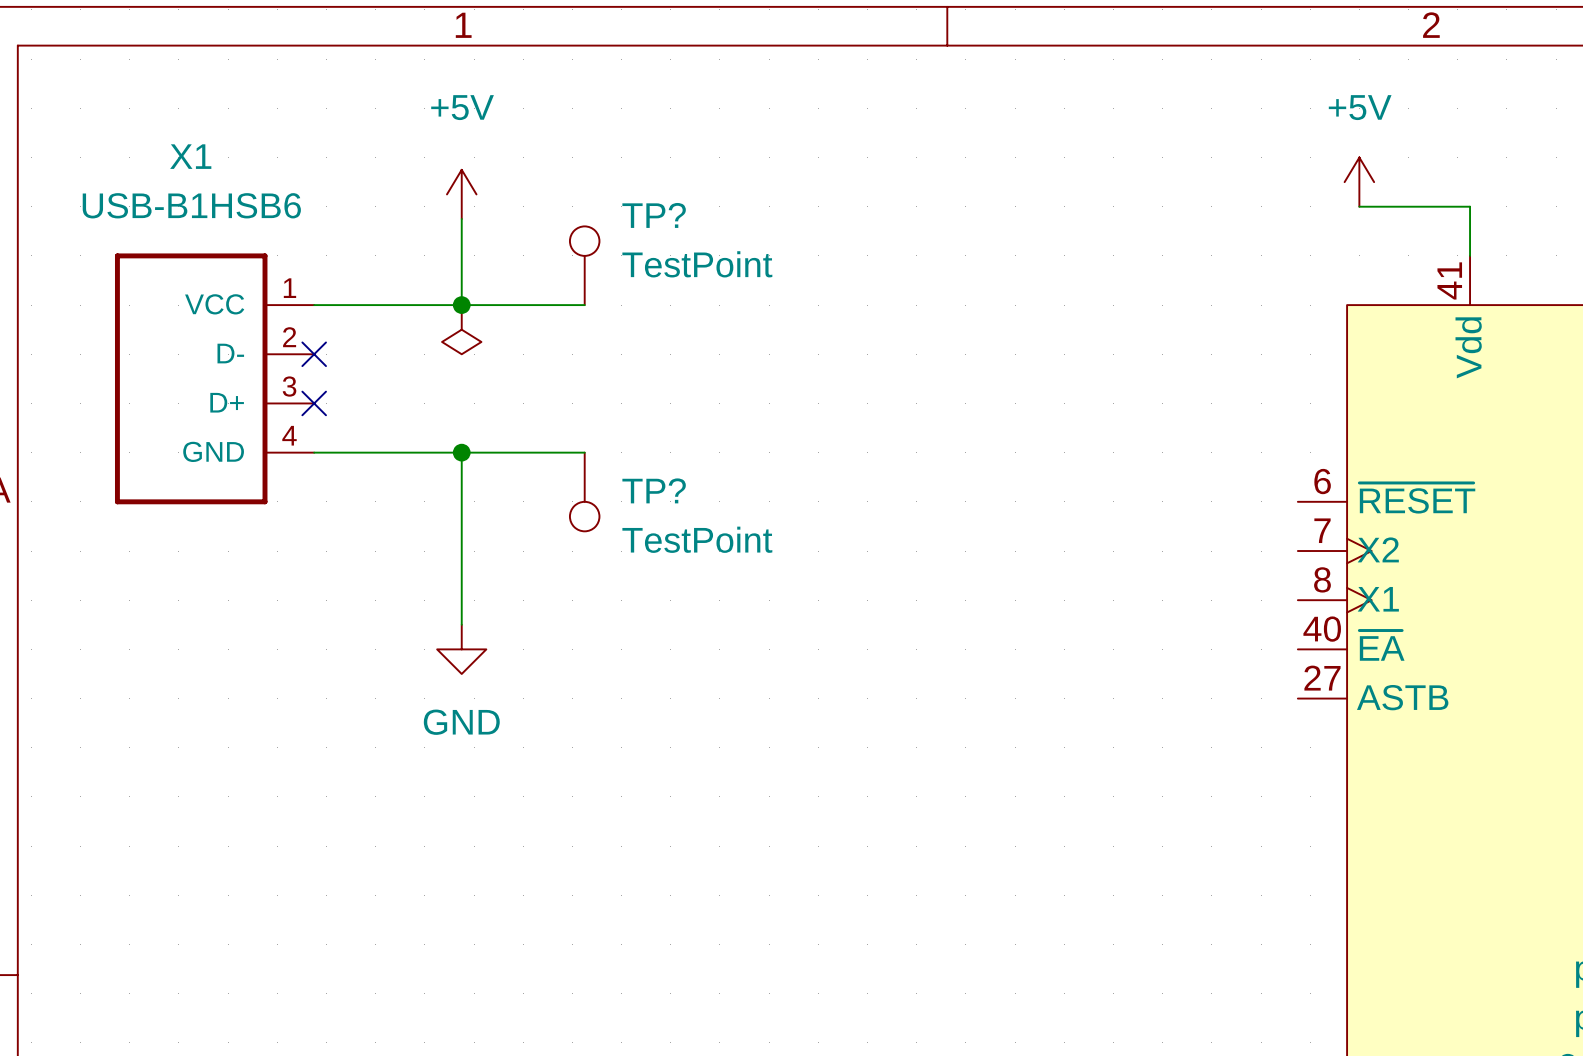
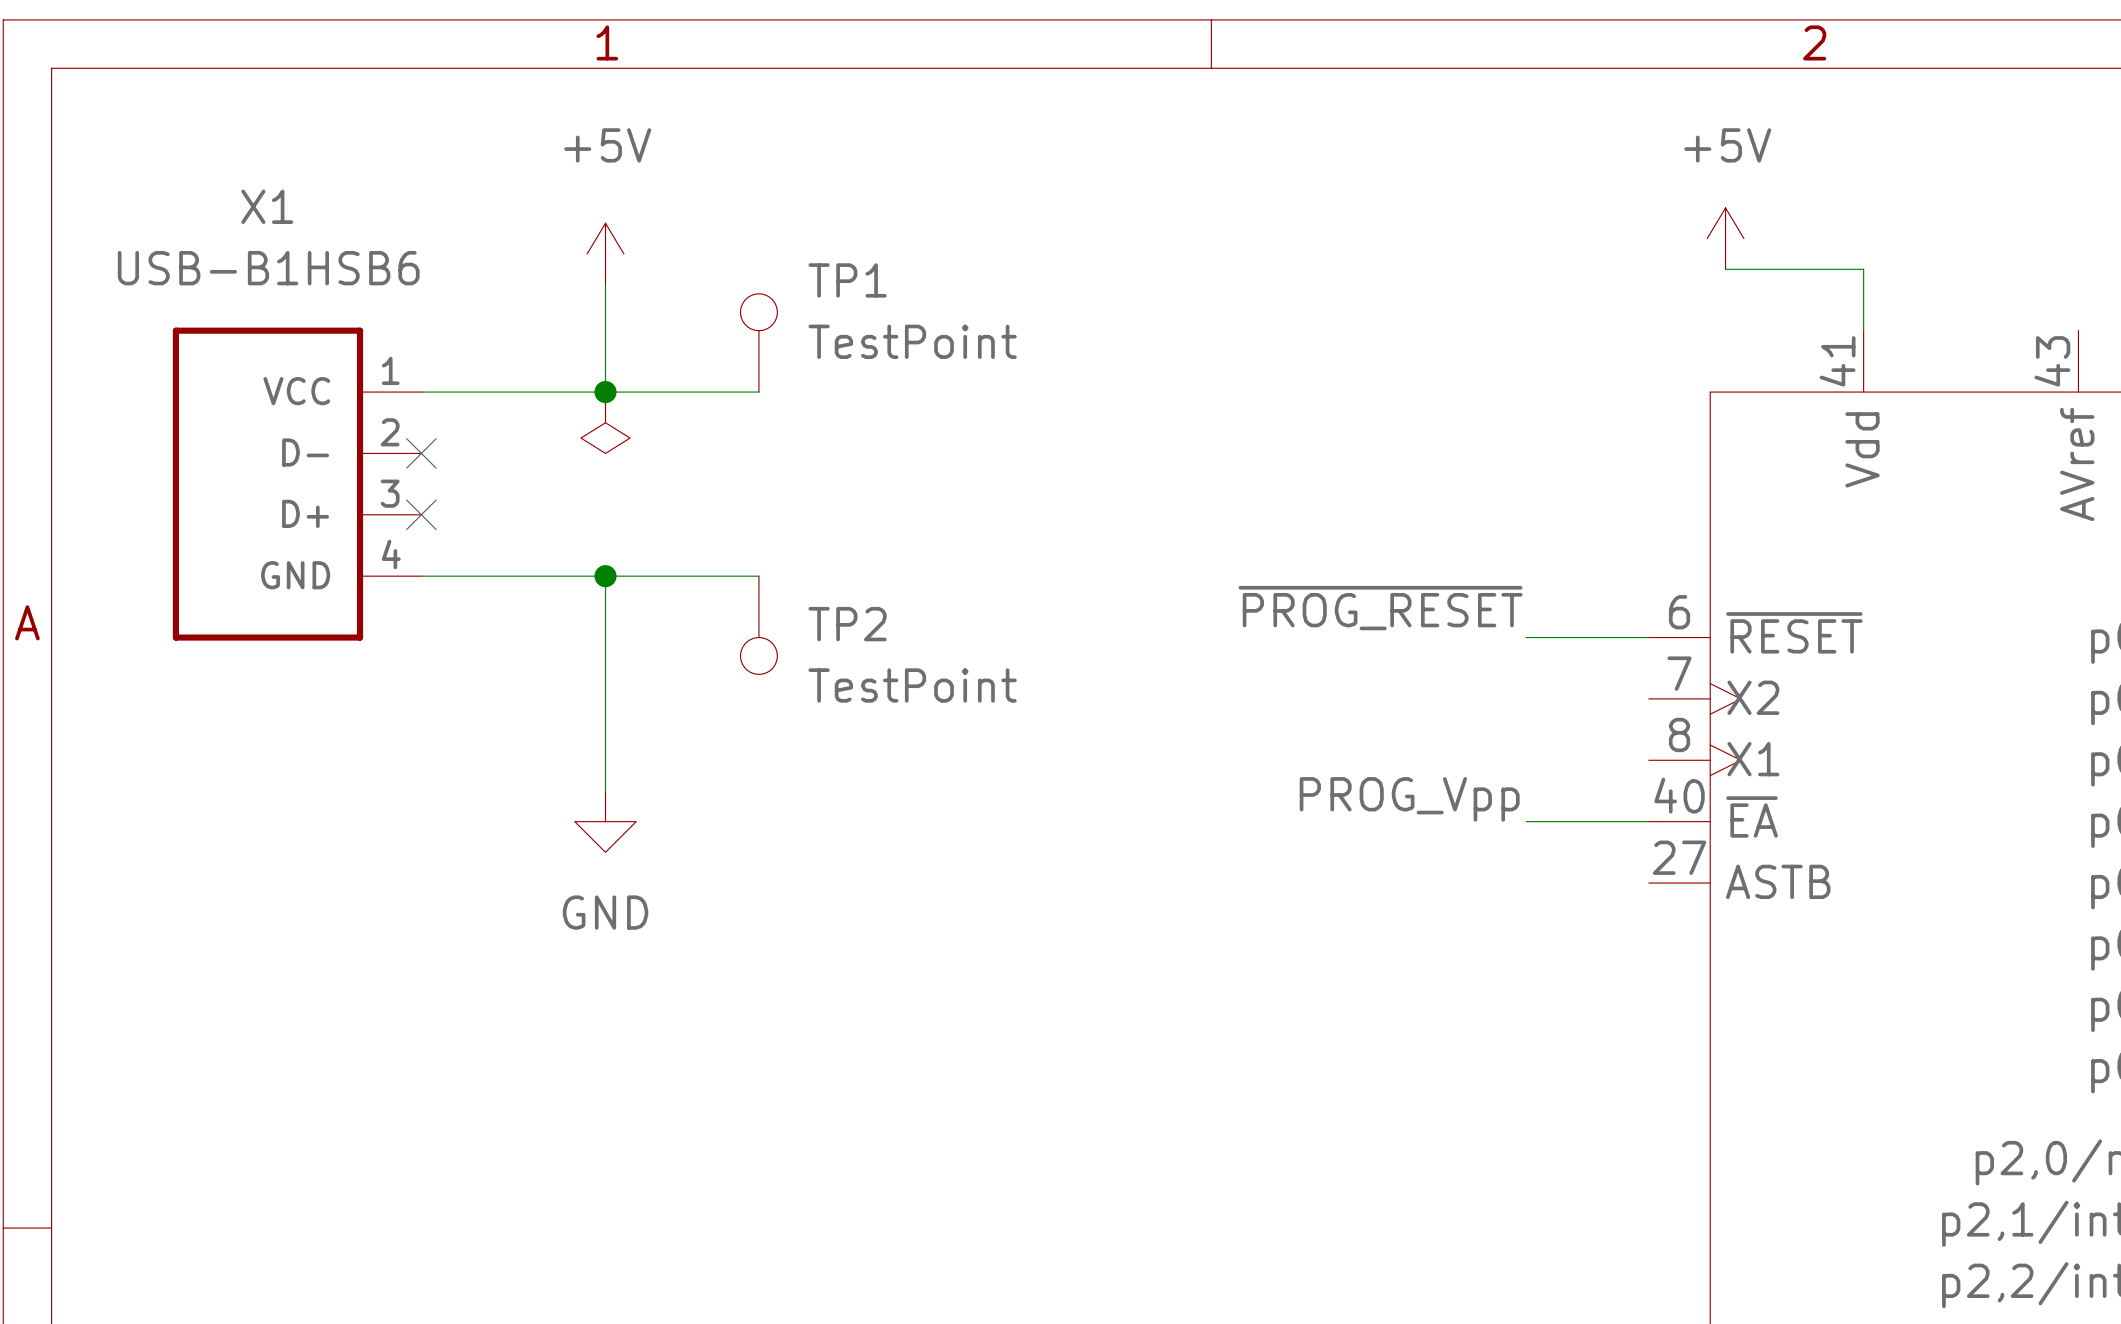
TP? name: TP? (654, 215) -> TP1 (847, 280)
label: none -> ~{PROG_RESET} (1380, 608)
TP? name: TP? (654, 490) -> TP2 (847, 624)
wire: none -> (1526, 637) (1648, 637)
label: none -> PROG_Vpp (1409, 799)
wire: none -> (1526, 821) (1648, 821)

